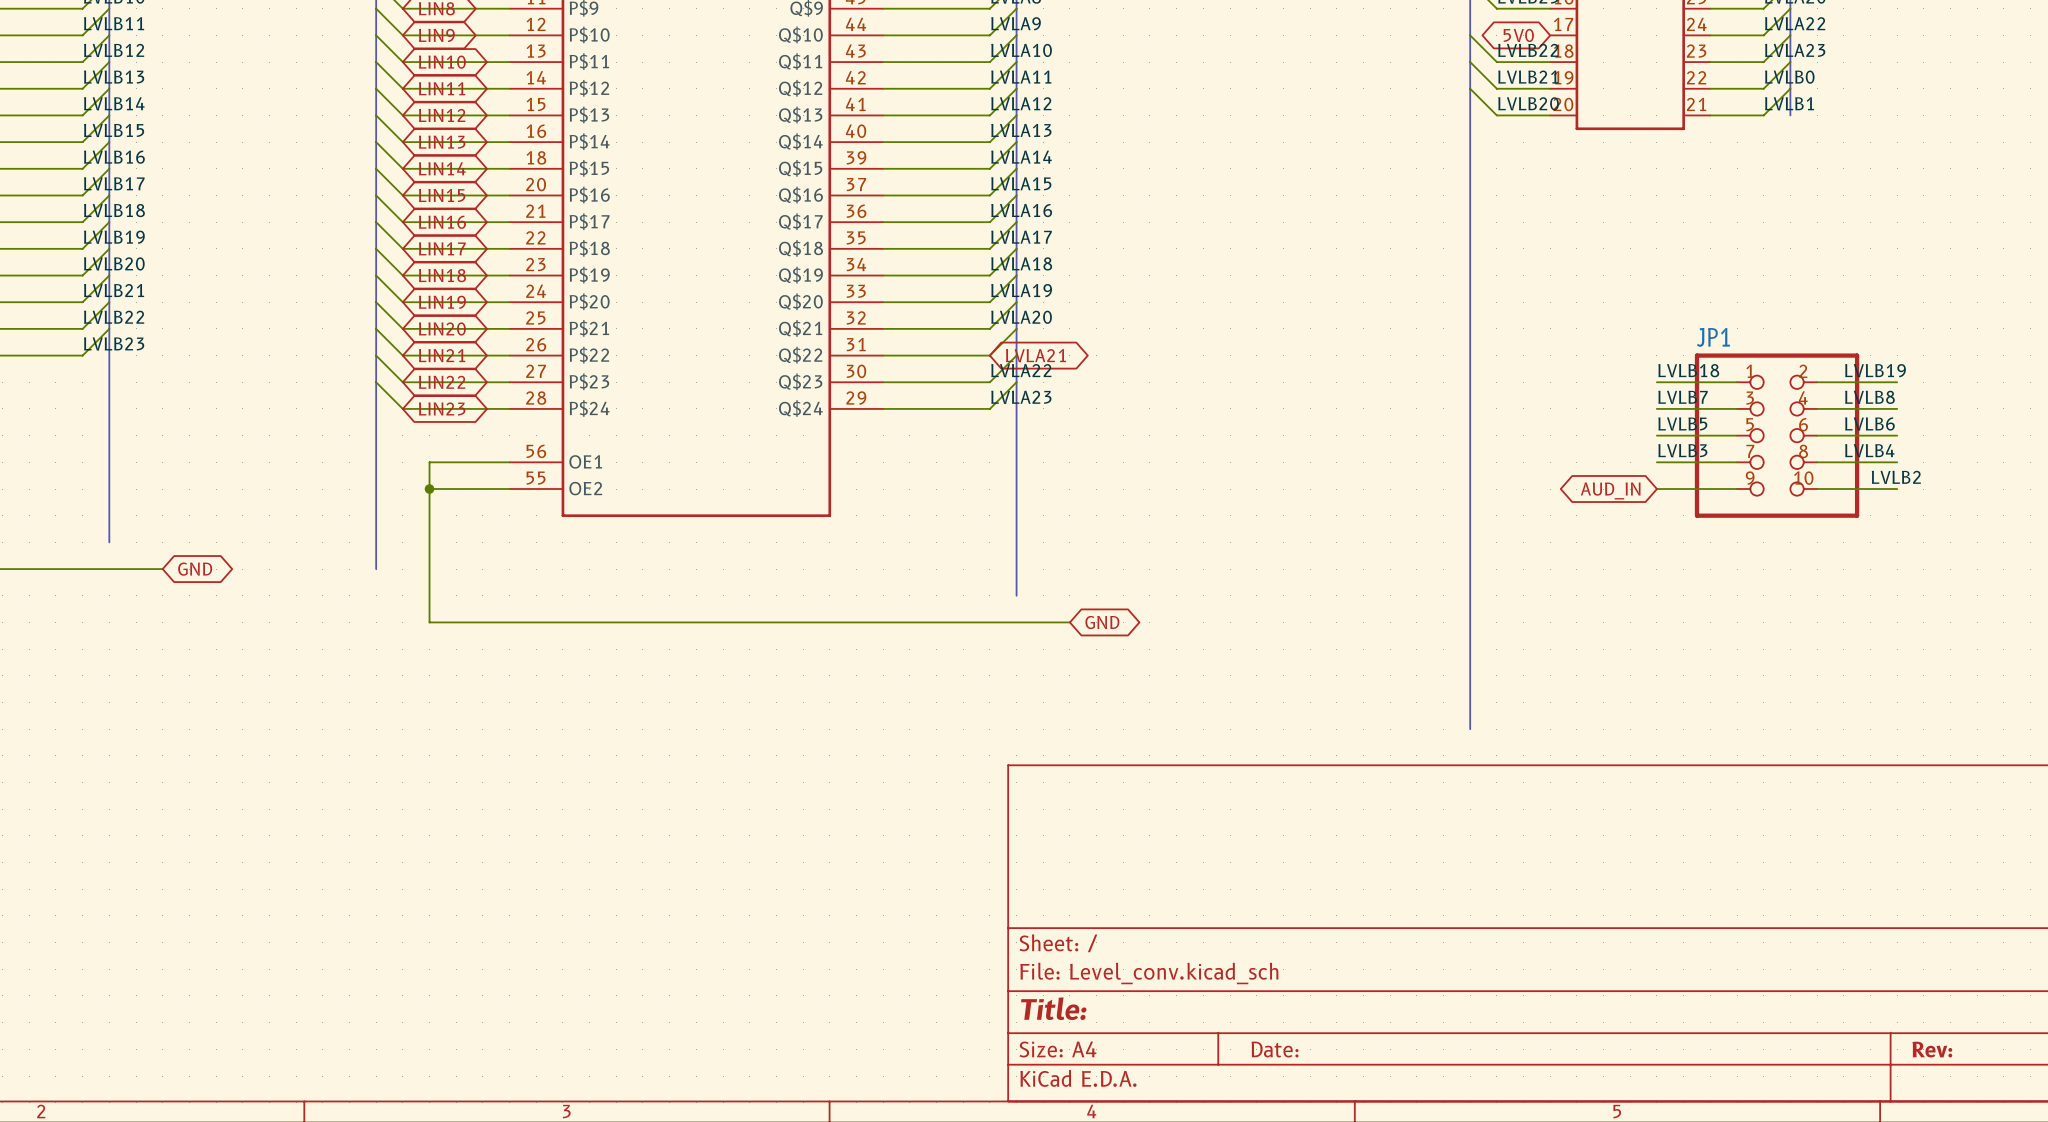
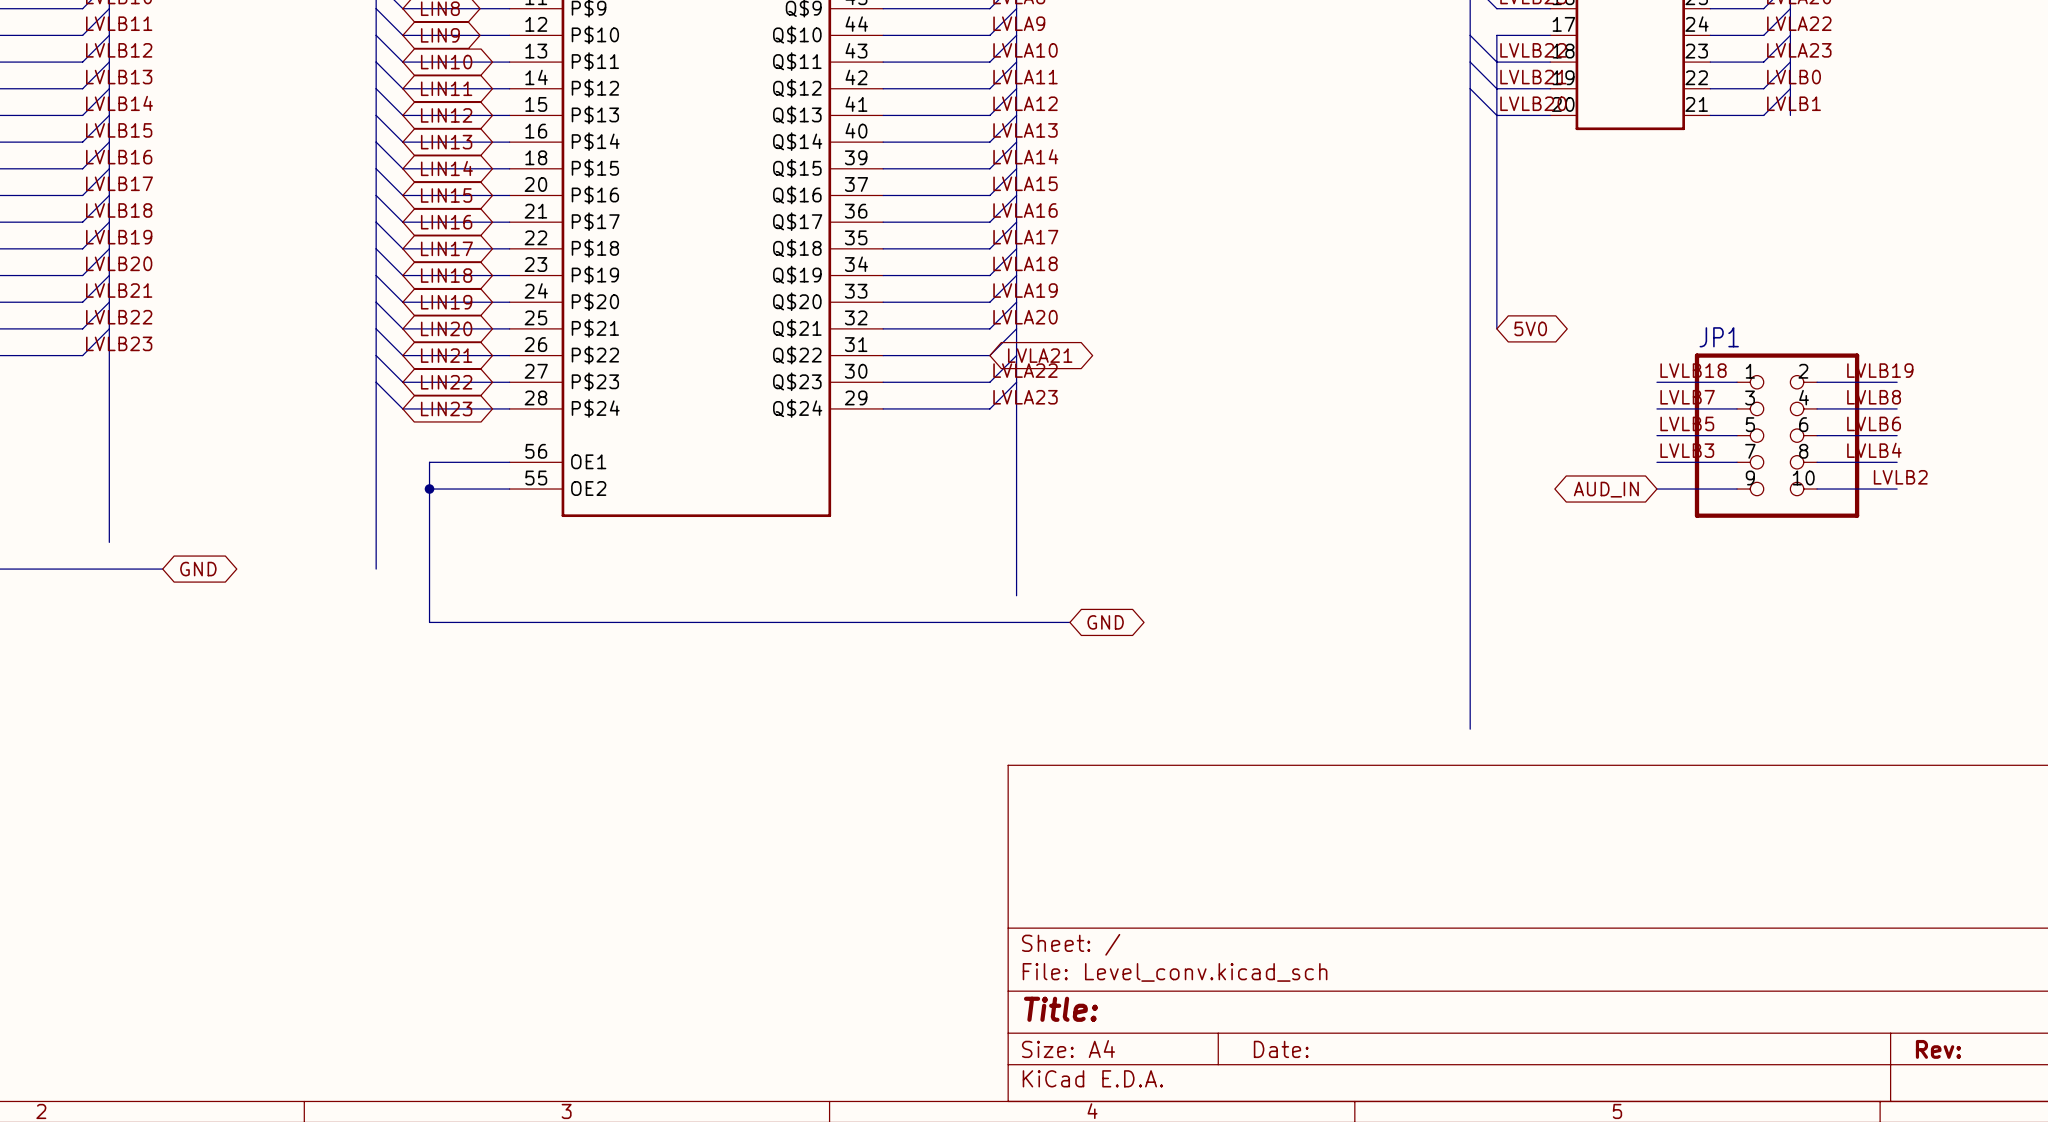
global label: 5V0 (1518, 35) -> none
wire: none -> (1550, 35) (1496, 35) (1496, 328)
global label: none -> 5V0 (1530, 328)

